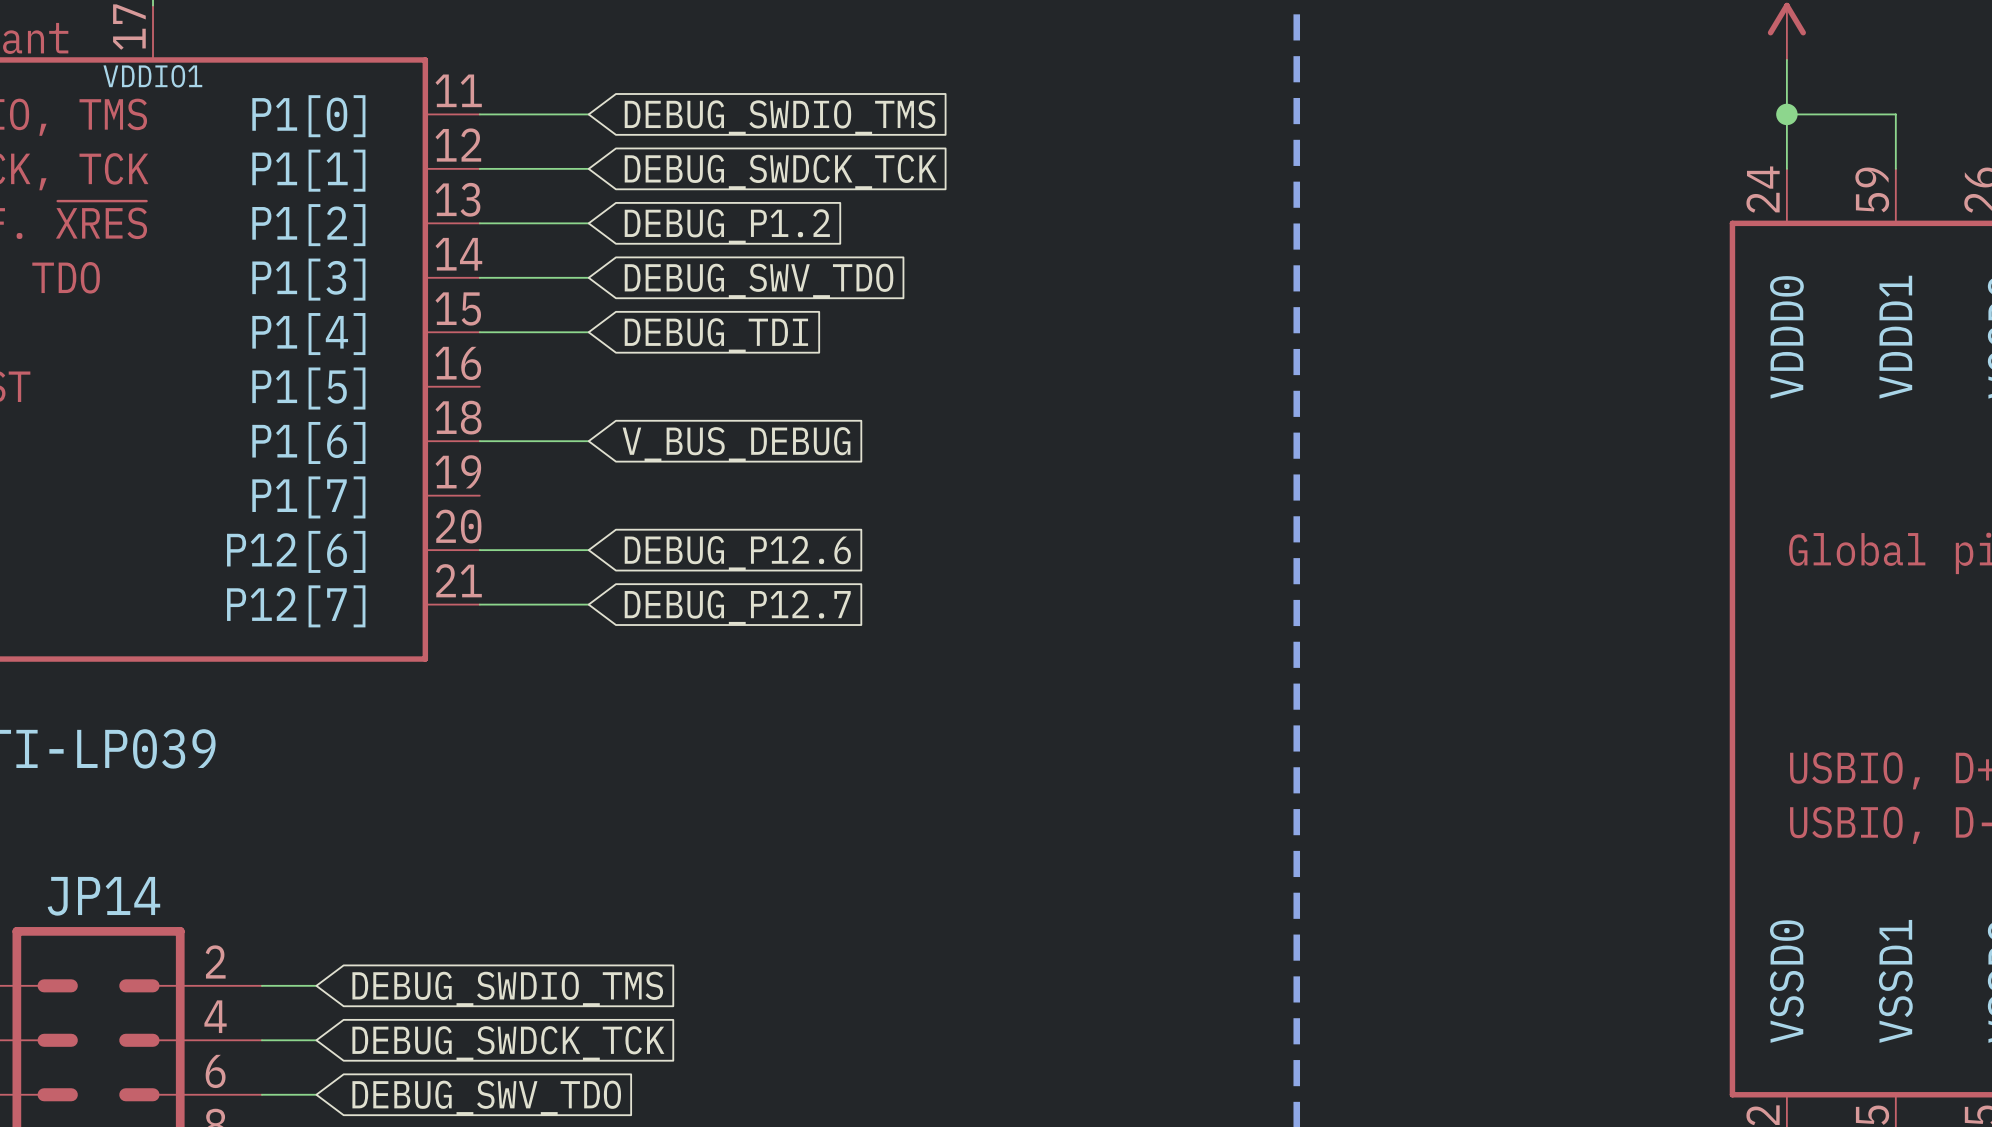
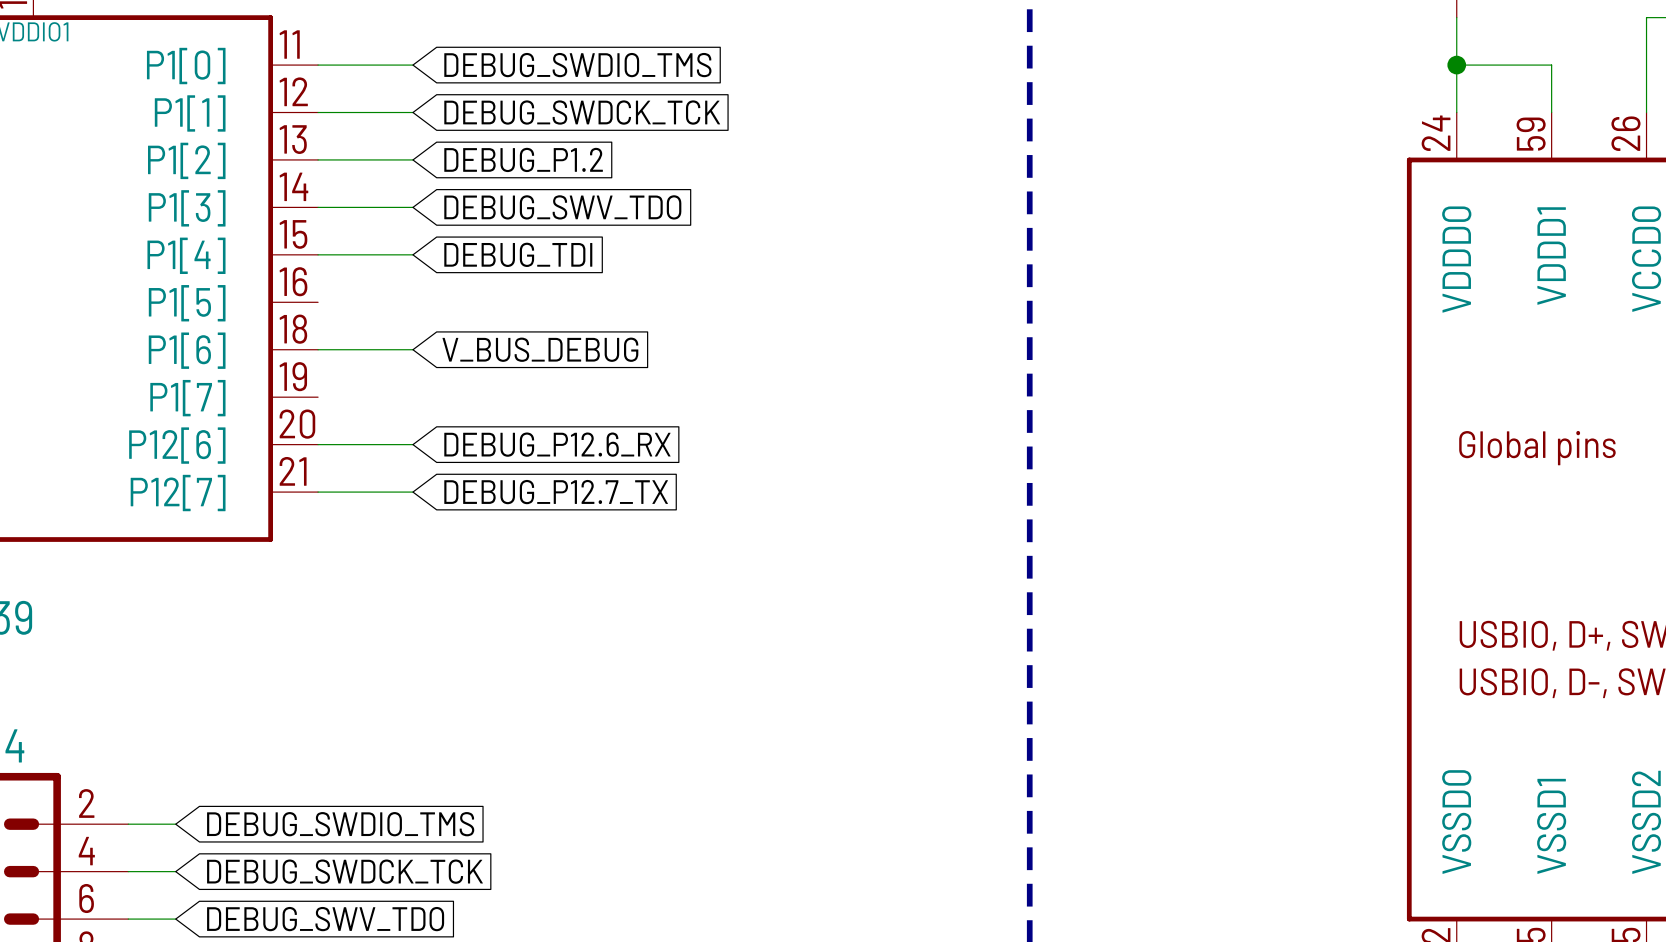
global label: DEBUG_P12.6 (737, 553) -> DEBUG_P12.6_RX (557, 444)
global label: DEBUG_P12.7 (737, 607) -> DEBUG_P12.7_TX (556, 492)

